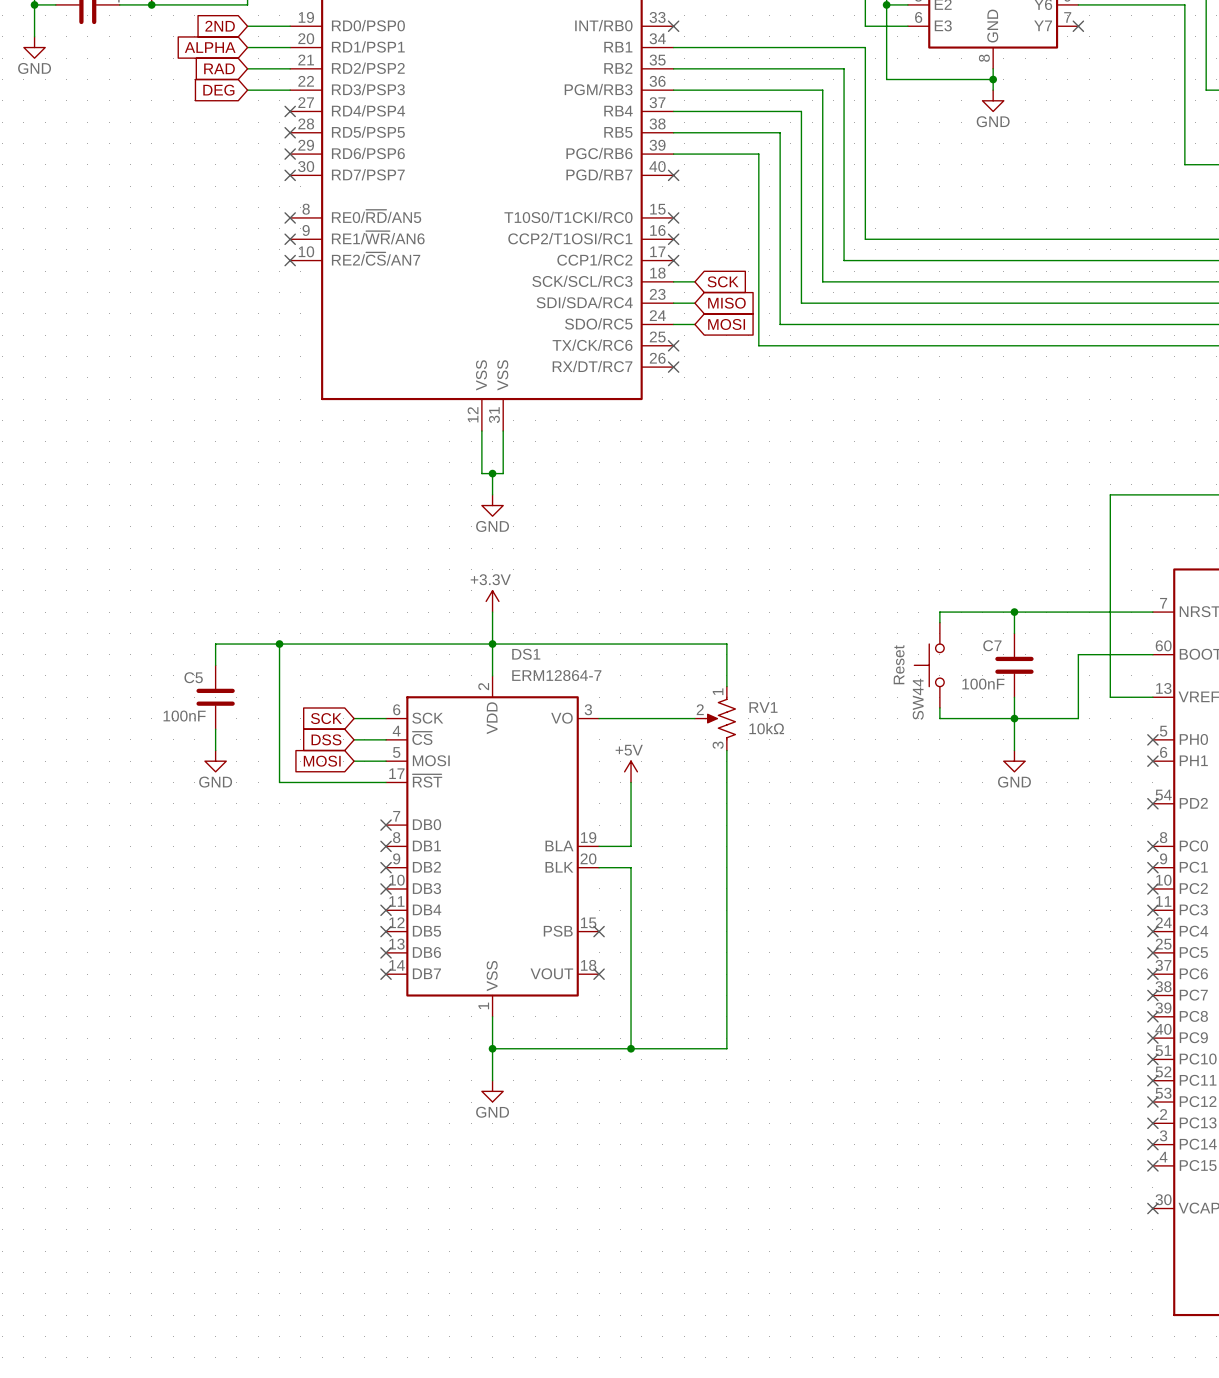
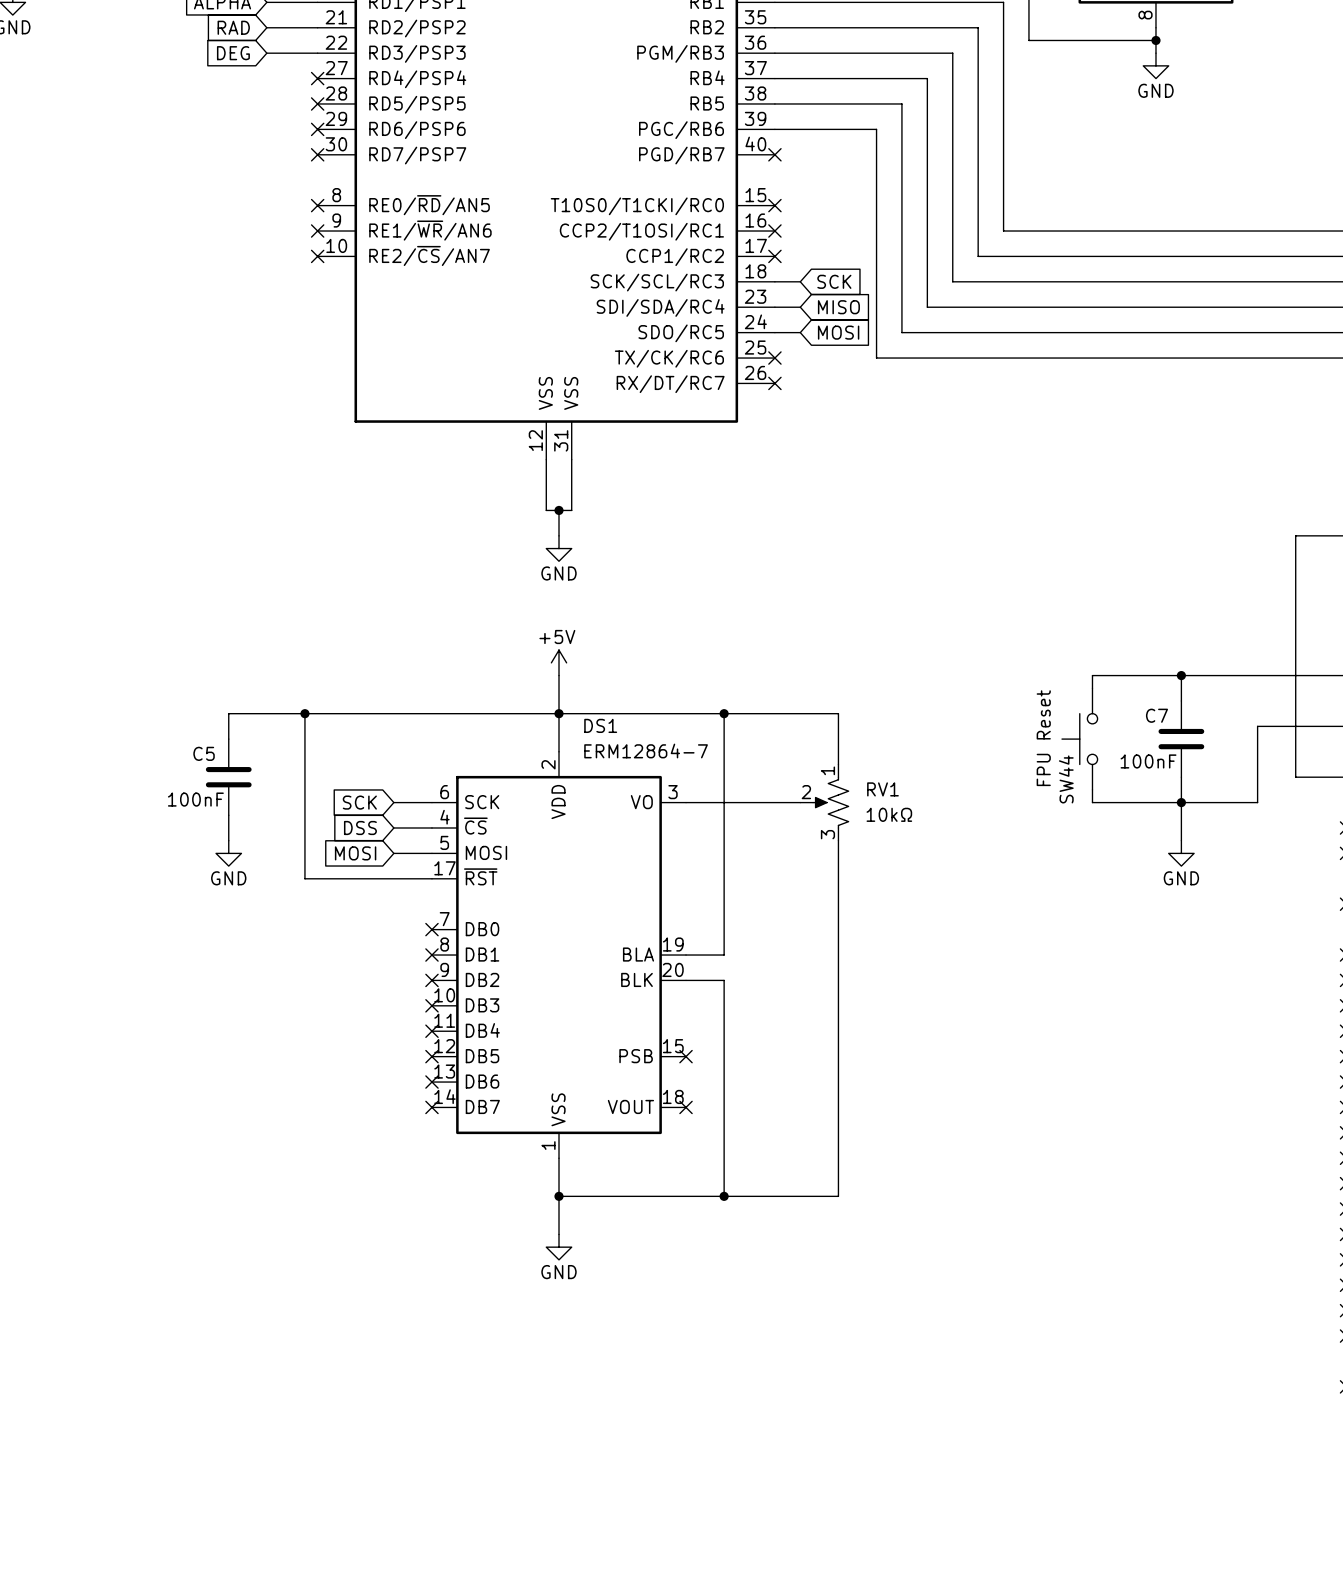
power symbol: +3.3V (492, 601) -> +5V (559, 662)
wire: none -> (724, 713) (724, 878)
junction: none -> (724, 713)
SW44 value: Reset (899, 664) -> FPU Reset (1043, 738)
power symbol: +5V (631, 771) -> none

